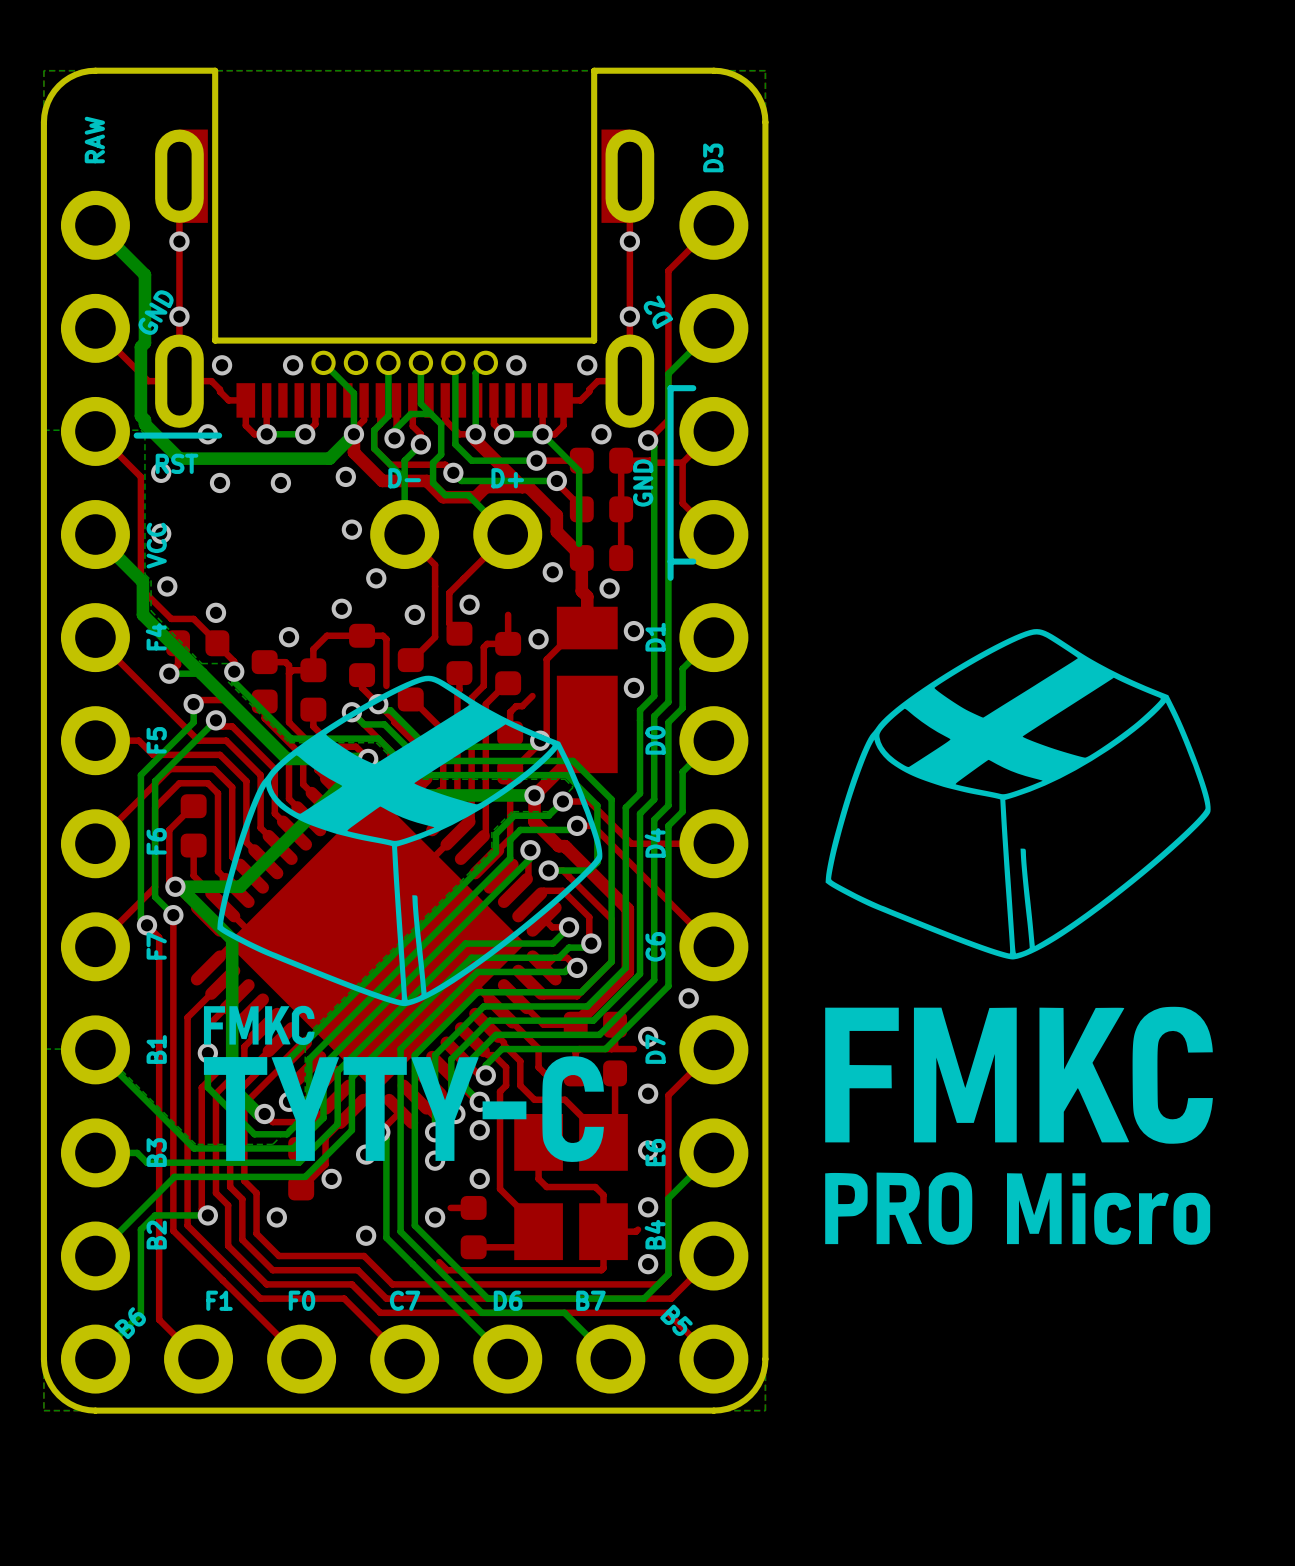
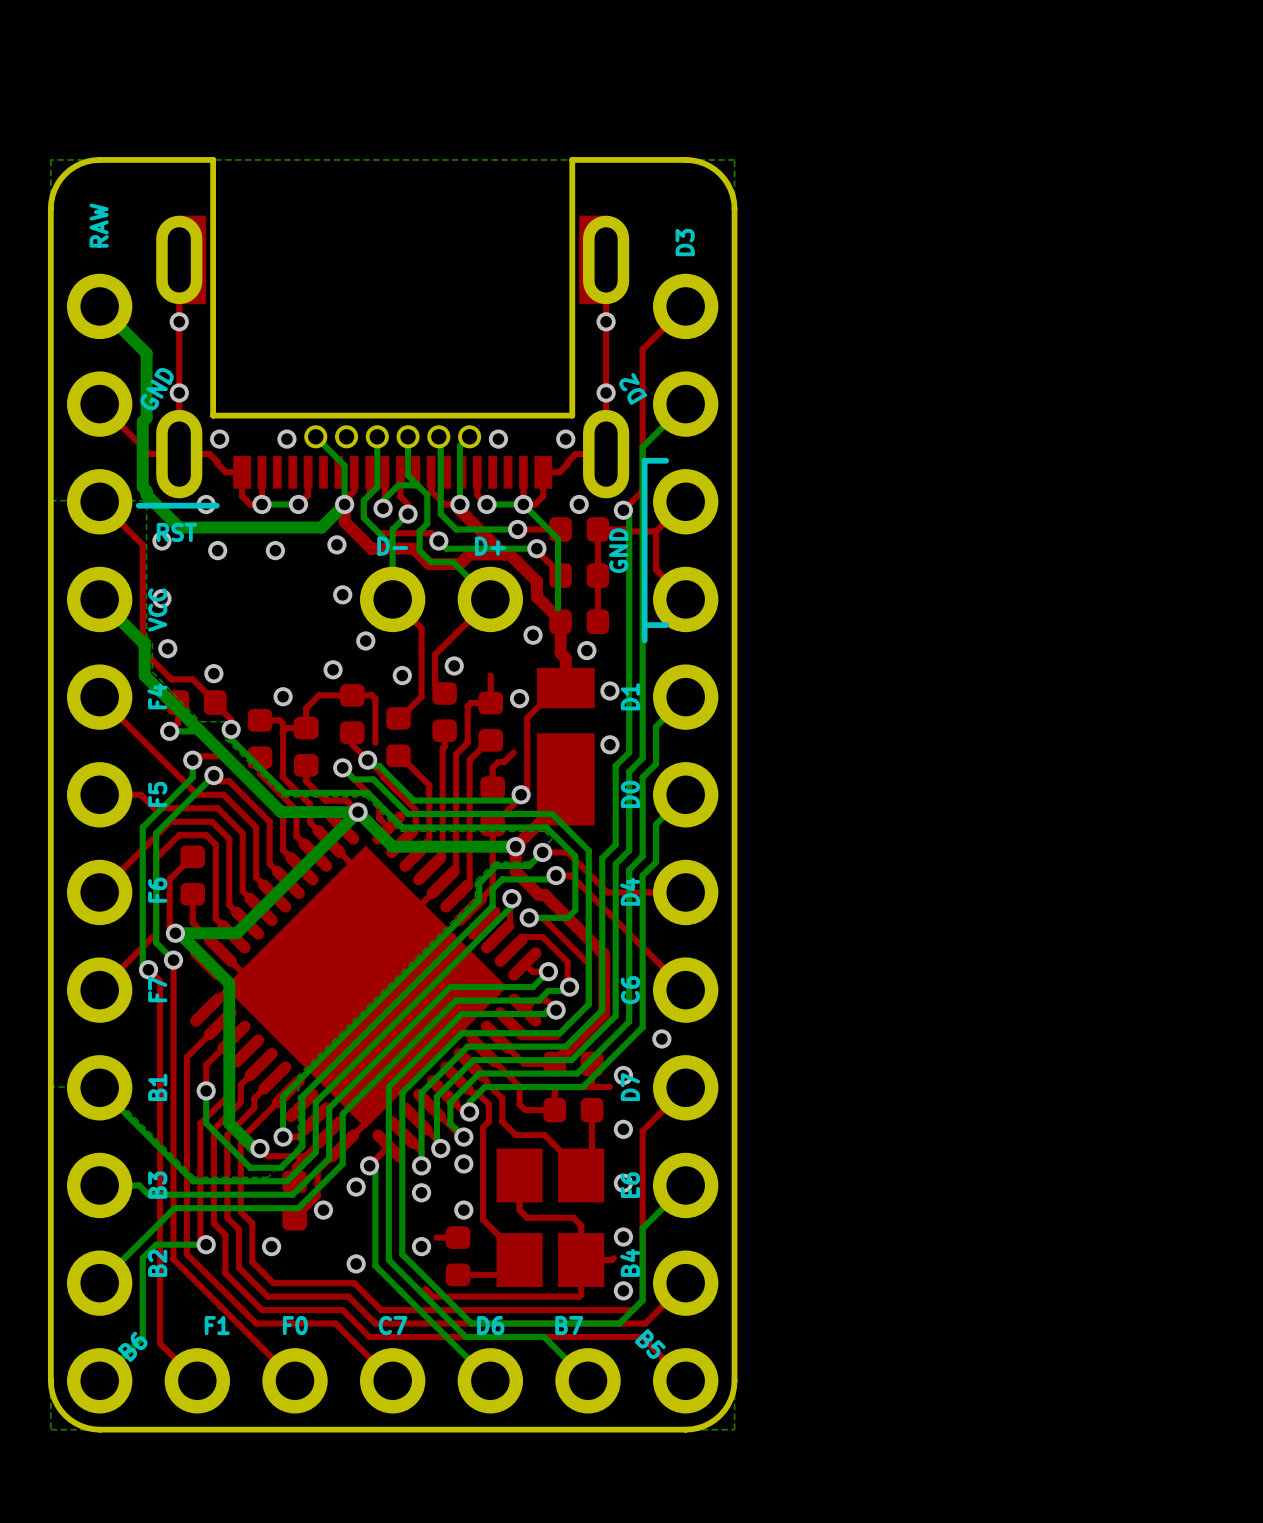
drawing: [825, 629, 1213, 1245] -> none
drawing: [203, 675, 604, 1162] -> none

